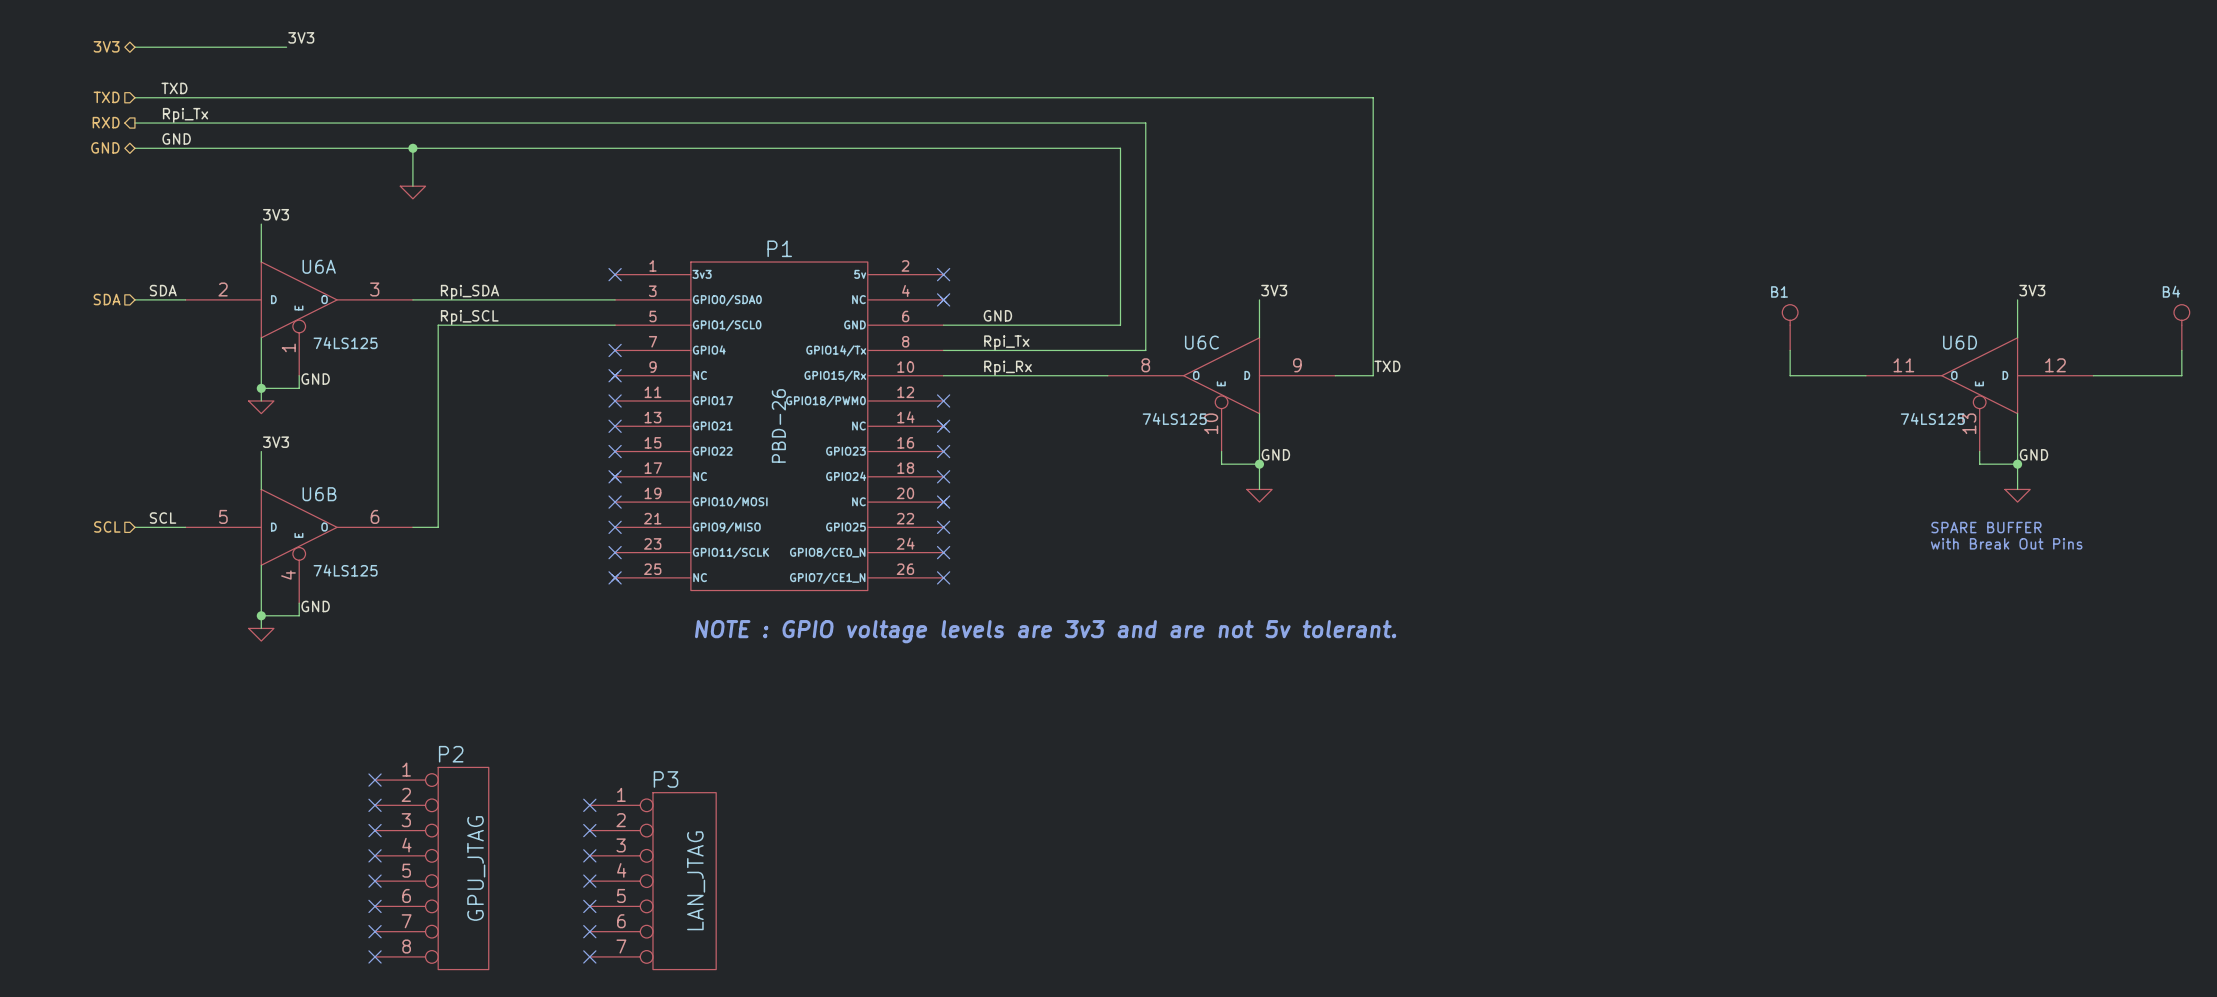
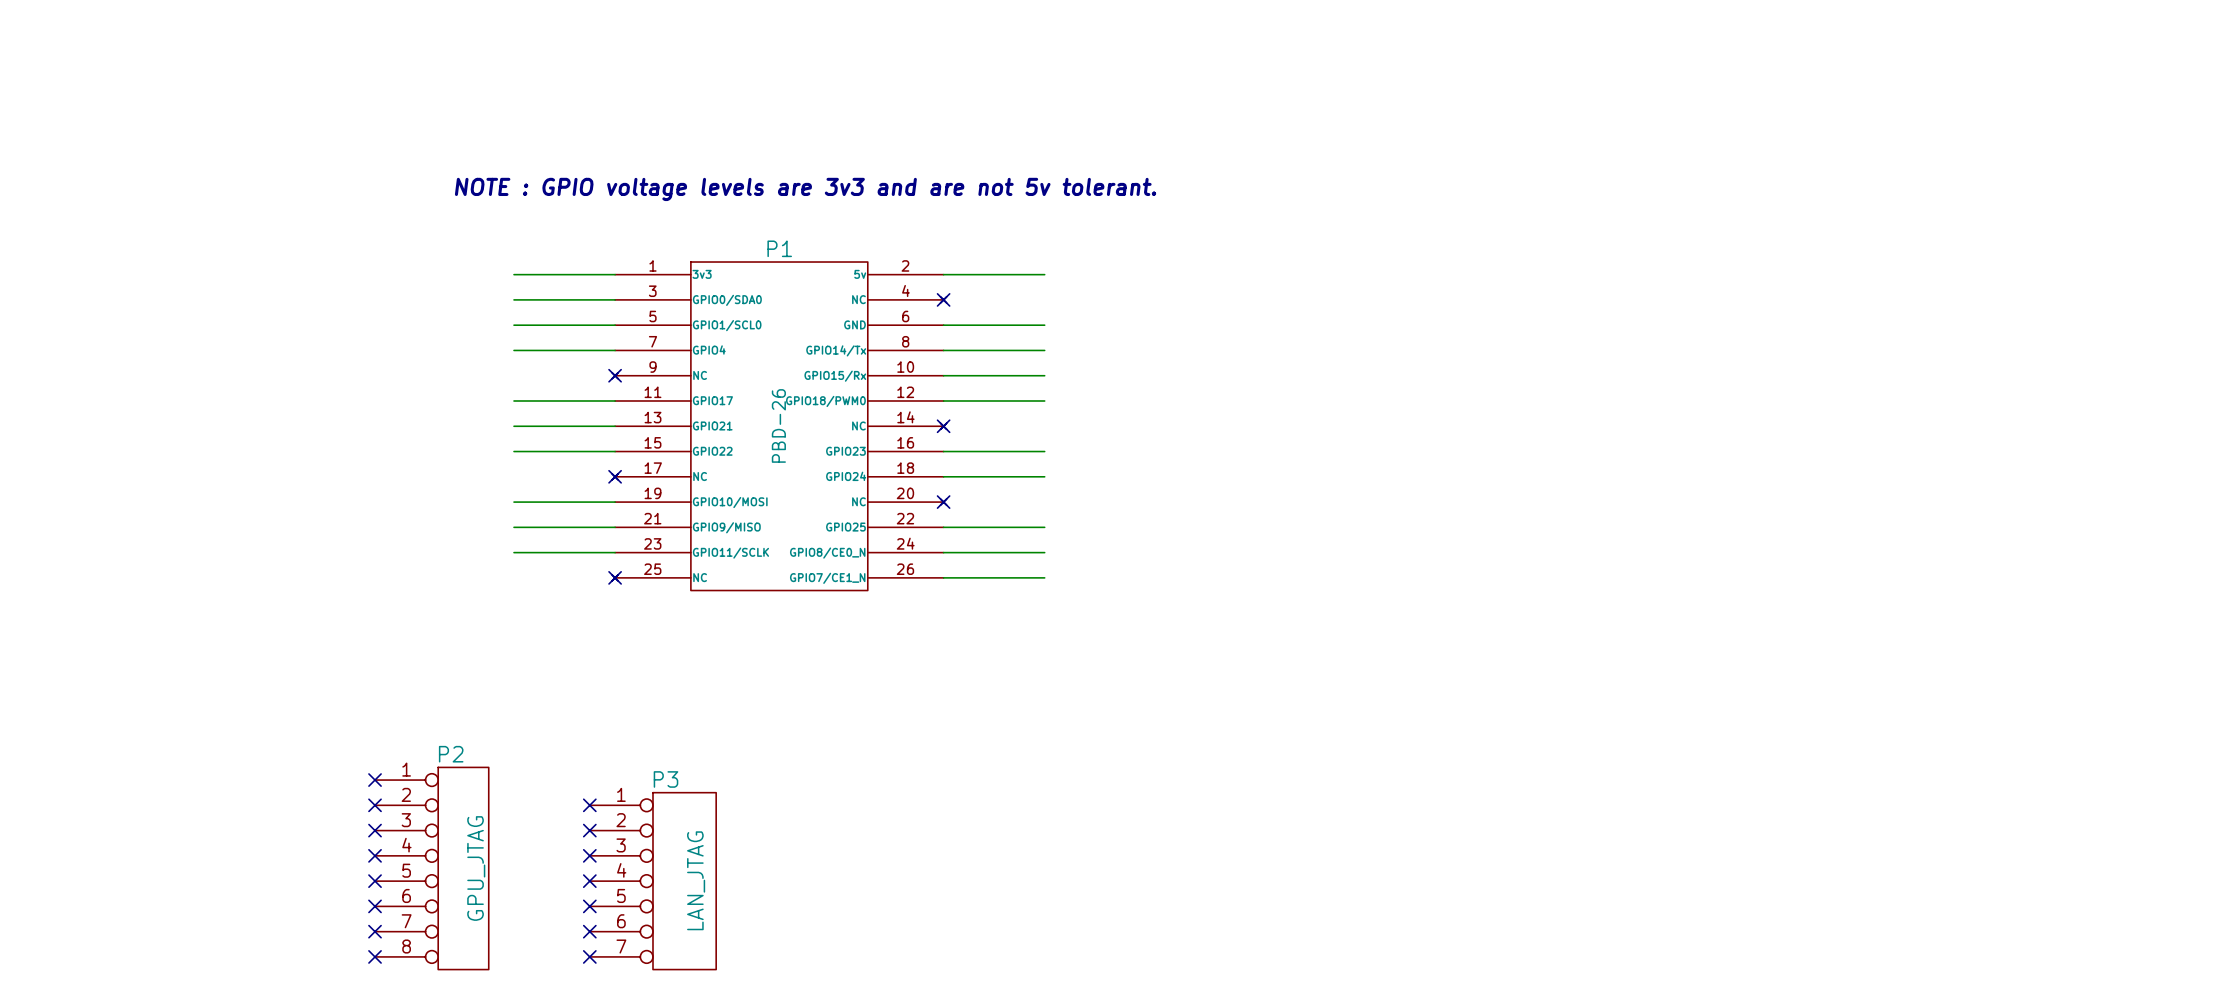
label: 3V3 (301, 37) -> none
hierarchical label: 3V3 (106, 46) -> none
wire: (134, 47) (286, 47) -> none
label: TXD (174, 88) -> none
hierarchical label: TXD (106, 97) -> none
wire: (134, 97) (1373, 97) (1373, 375) (1335, 375) -> none
label: Rpi_Tx (185, 115) -> none
hierarchical label: RXD (106, 122) -> none
wire: (134, 123) (1145, 123) (1145, 350) (1044, 350) -> none
label: GND (176, 138) -> none
hierarchical label: GND (105, 147) -> none
wire: (134, 148) (1120, 148) (1120, 325) (1044, 325) -> none
wire: (412, 148) (412, 186) -> none
junction: (412, 148) -> none
text: none -> NOTE : GPIO voltage levels are 3v3 and are not 5v tolerant. (805, 189)
power symbol: (412, 192) -> none
label: 3V3 (276, 214) -> none
wire: (261, 224) (261, 262) -> none
no-connect mark: (615, 274) -> none
wire: none -> (943, 274) (1044, 274)
no-connect mark: (943, 274) -> none
label: SDA (163, 290) -> none
label: 3V3 (1274, 290) -> none
label: 3V3 (2032, 290) -> none
label: Rpi_SDA (470, 292) -> none
hierarchical label: SDA (107, 299) -> none
wire: (134, 299) (185, 299) -> none
wire: (412, 299) (514, 299) -> (514, 274) (615, 274)
wire: (1259, 299) (1259, 337) -> none
wire: (2017, 299) (2017, 337) -> none
label: GND (997, 315) -> none
label: Rpi_SCL (469, 317) -> none
U6A: 74LS125 (299, 318) -> none
wire: (514, 325) (438, 325) (438, 527) (412, 527) -> none
B1: (1790, 327) -> none
B4: (2181, 327) -> none
wire: (261, 337) (261, 400) -> none
label: Rpi_Tx (1006, 342) -> none
wire: none -> (514, 350) (615, 350)
no-connect mark: (615, 350) -> none
wire: (1790, 350) (1790, 375) (1865, 375) -> none
wire: (2181, 350) (2181, 375) (2093, 375) -> none
label: TXD (1387, 366) -> none
label: Rpi_Rx (1008, 368) -> none
wire: (299, 375) (299, 388) (261, 388) -> none
wire: (1044, 375) (1107, 375) -> none
label: GND (315, 379) -> none
junction: (261, 388) -> none
U6C: 74LS125 (1221, 394) -> none
U6D: 74LS125 (1979, 394) -> none
wire: none -> (514, 400) (615, 400)
no-connect mark: (615, 400) -> none
wire: none -> (943, 400) (1044, 400)
no-connect mark: (943, 400) -> none
power symbol: (261, 407) -> none
wire: (1259, 413) (1259, 489) -> none
wire: (2017, 413) (2017, 489) -> none
wire: none -> (514, 426) (615, 426)
no-connect mark: (615, 426) -> none
label: 3V3 (276, 442) -> none
wire: (261, 451) (261, 489) -> none
wire: none -> (514, 451) (615, 451)
no-connect mark: (615, 451) -> none
wire: none -> (943, 451) (1044, 451)
no-connect mark: (943, 451) -> none
wire: (1221, 451) (1221, 464) (1259, 464) -> none
wire: (1979, 451) (1979, 464) (2017, 464) -> none
label: GND (1275, 454) -> none
label: GND (2033, 454) -> none
junction: (1259, 464) -> none
junction: (2017, 464) -> none
wire: none -> (943, 476) (1044, 476)
no-connect mark: (943, 476) -> none
power symbol: (1259, 495) -> none
power symbol: (2017, 495) -> none
wire: none -> (514, 502) (615, 502)
no-connect mark: (615, 502) -> none
label: SCL (163, 518) -> none
hierarchical label: SCL (107, 526) -> none
wire: (134, 527) (185, 527) -> none
wire: none -> (514, 527) (615, 527)
no-connect mark: (615, 527) -> none
wire: none -> (943, 527) (1044, 527)
no-connect mark: (943, 527) -> none
text: SPARE BUFFER (1986, 527) -> none
text: with Break Out Pins (2006, 543) -> none
U6B: 74LS125 (299, 546) -> none
wire: none -> (514, 552) (615, 552)
no-connect mark: (615, 552) -> none
wire: none -> (943, 552) (1044, 552)
no-connect mark: (943, 552) -> none
wire: (261, 565) (261, 628) -> none
wire: none -> (943, 577) (1044, 577)
no-connect mark: (943, 577) -> none
wire: (299, 603) (299, 615) (261, 615) -> none
label: GND (315, 606) -> none
junction: (261, 615) -> none
text: NOTE : GPIO voltage levels are 3v3 and are not 5v tolerant. (1045, 631) -> none
power symbol: (261, 634) -> none

